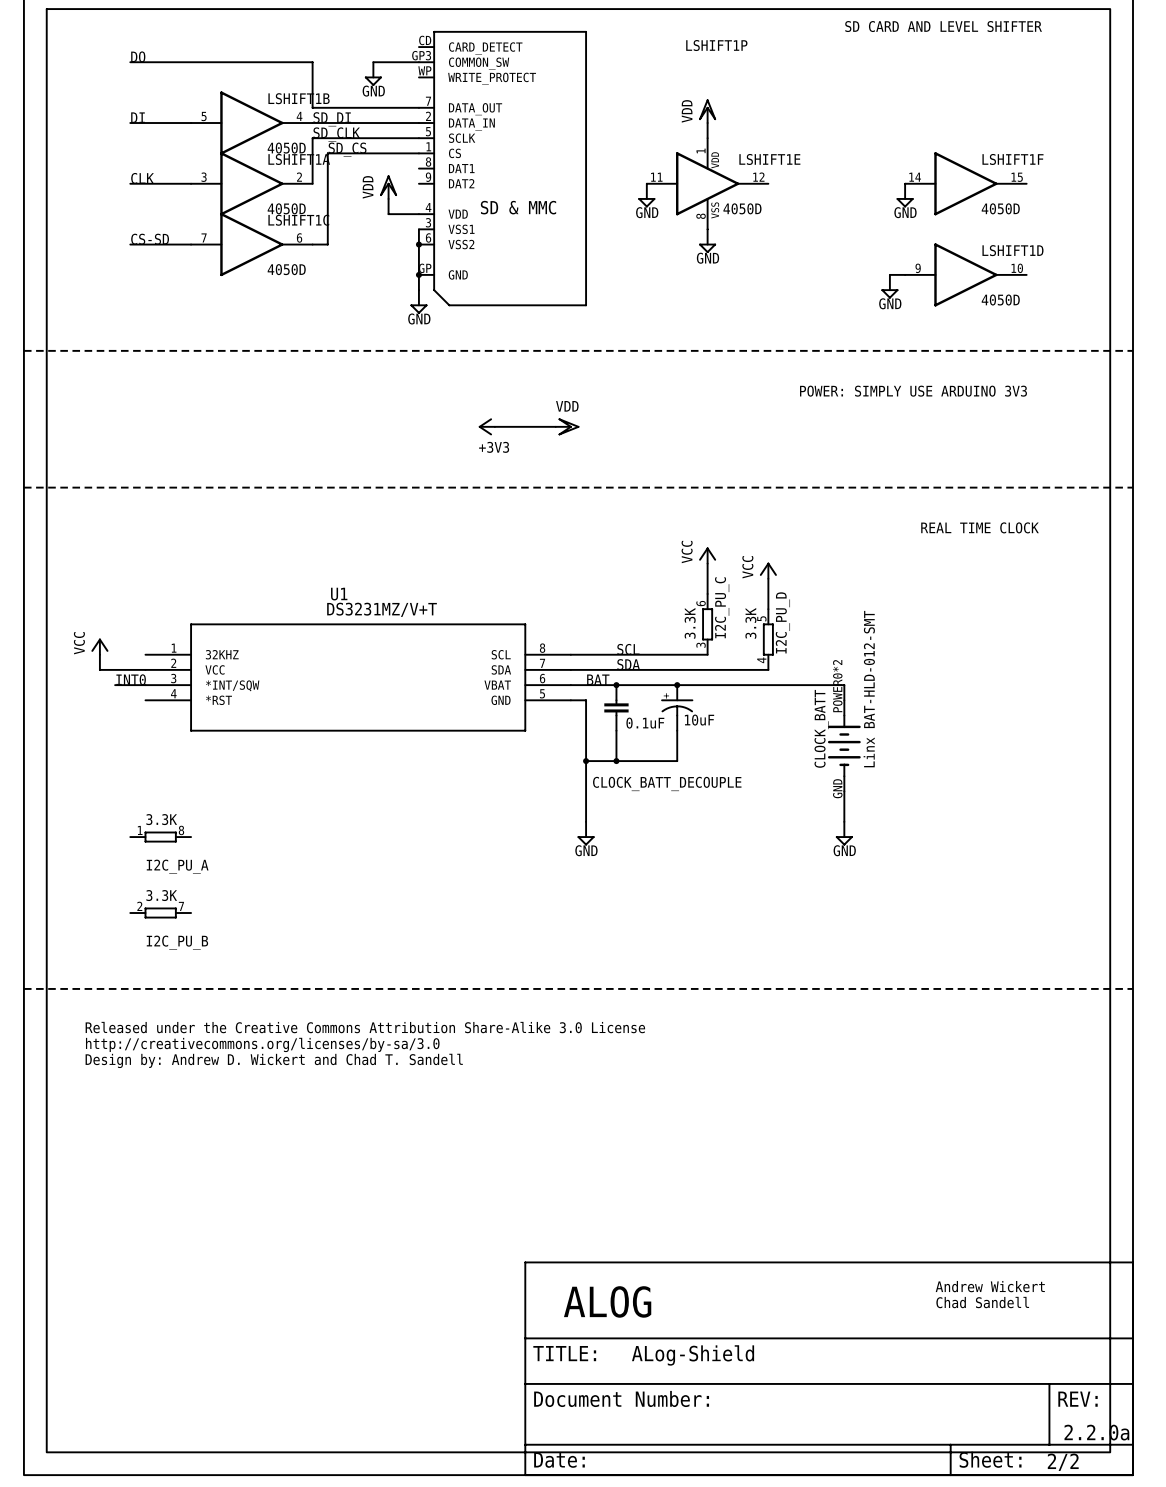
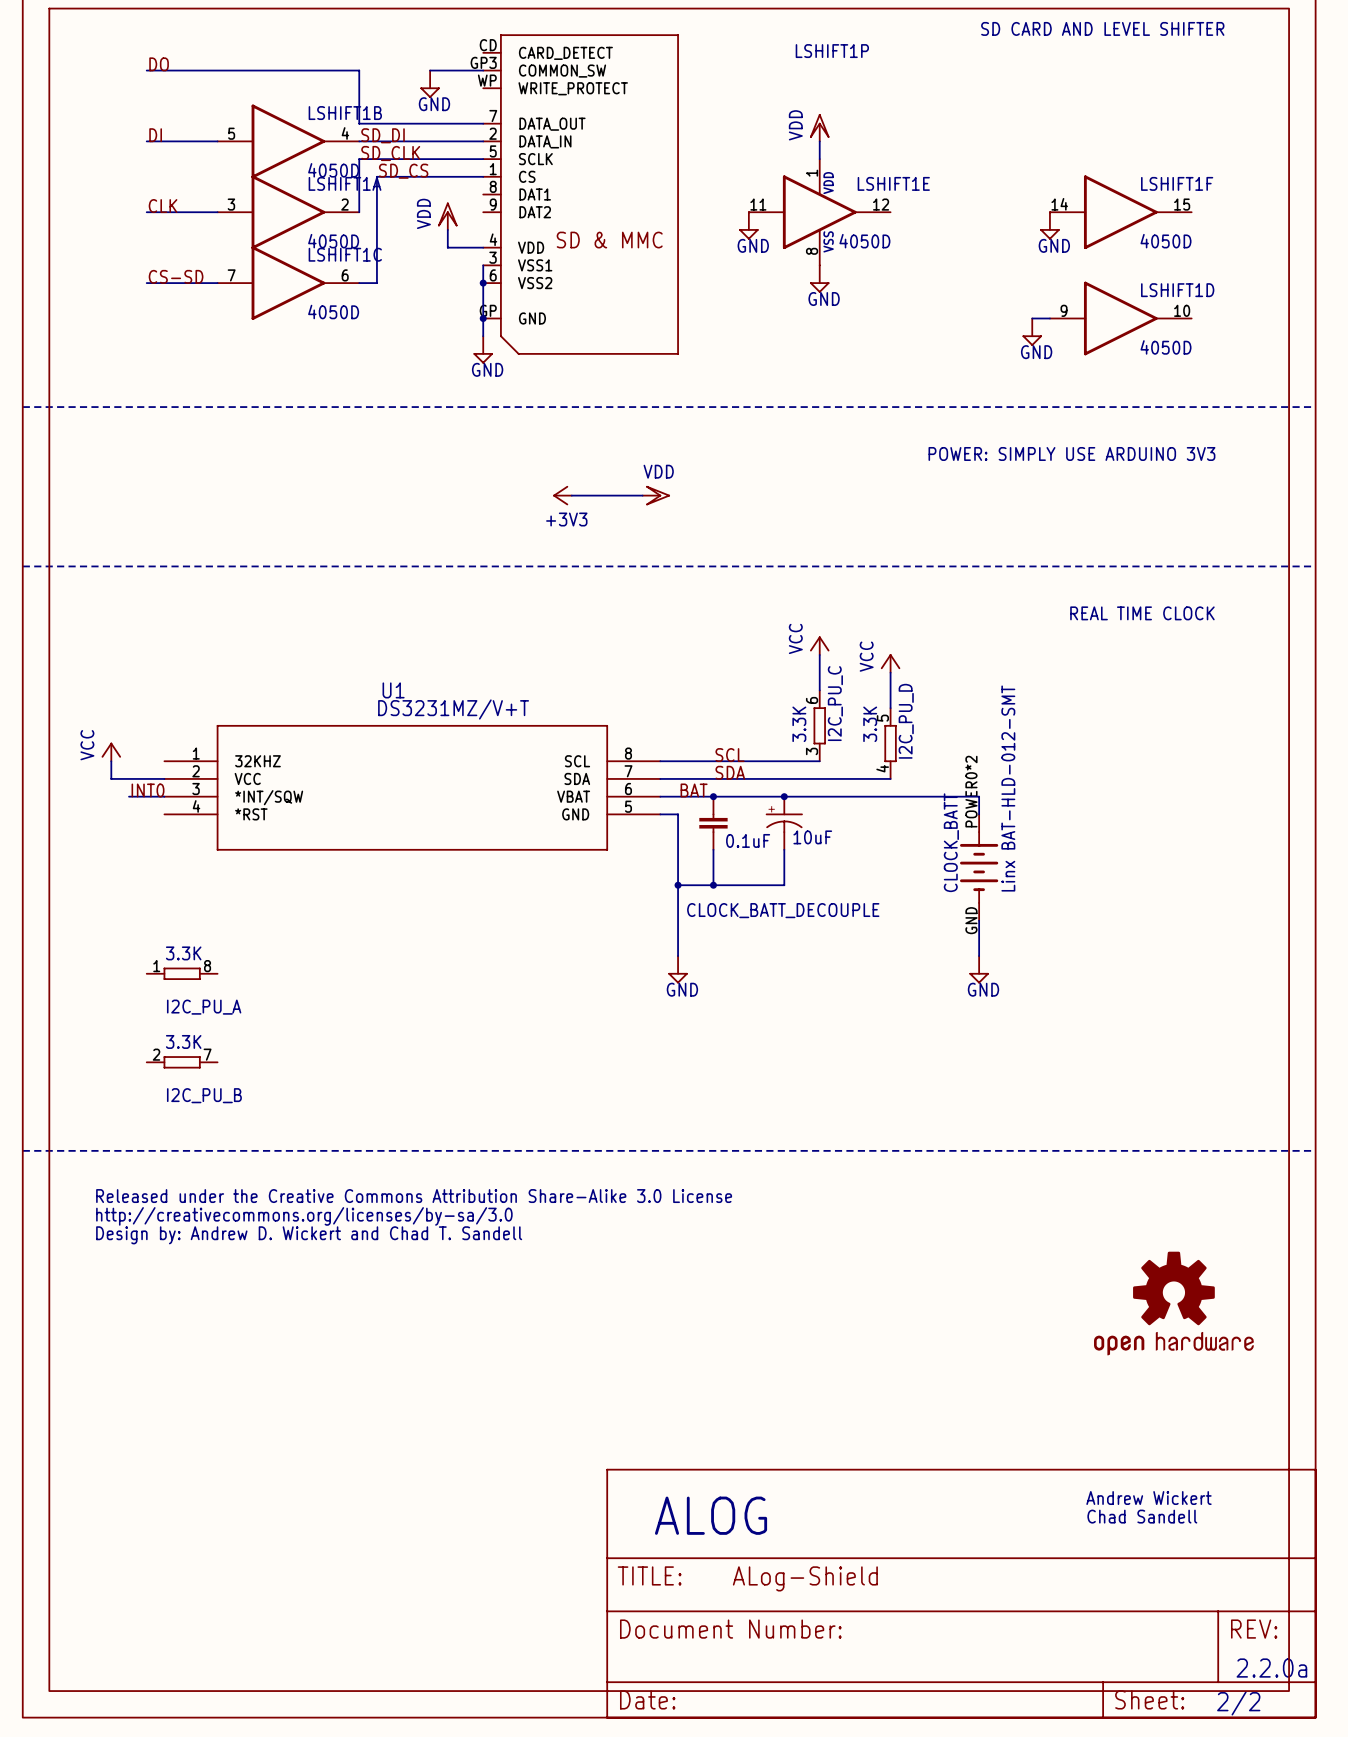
part: none -> (1173, 1303)

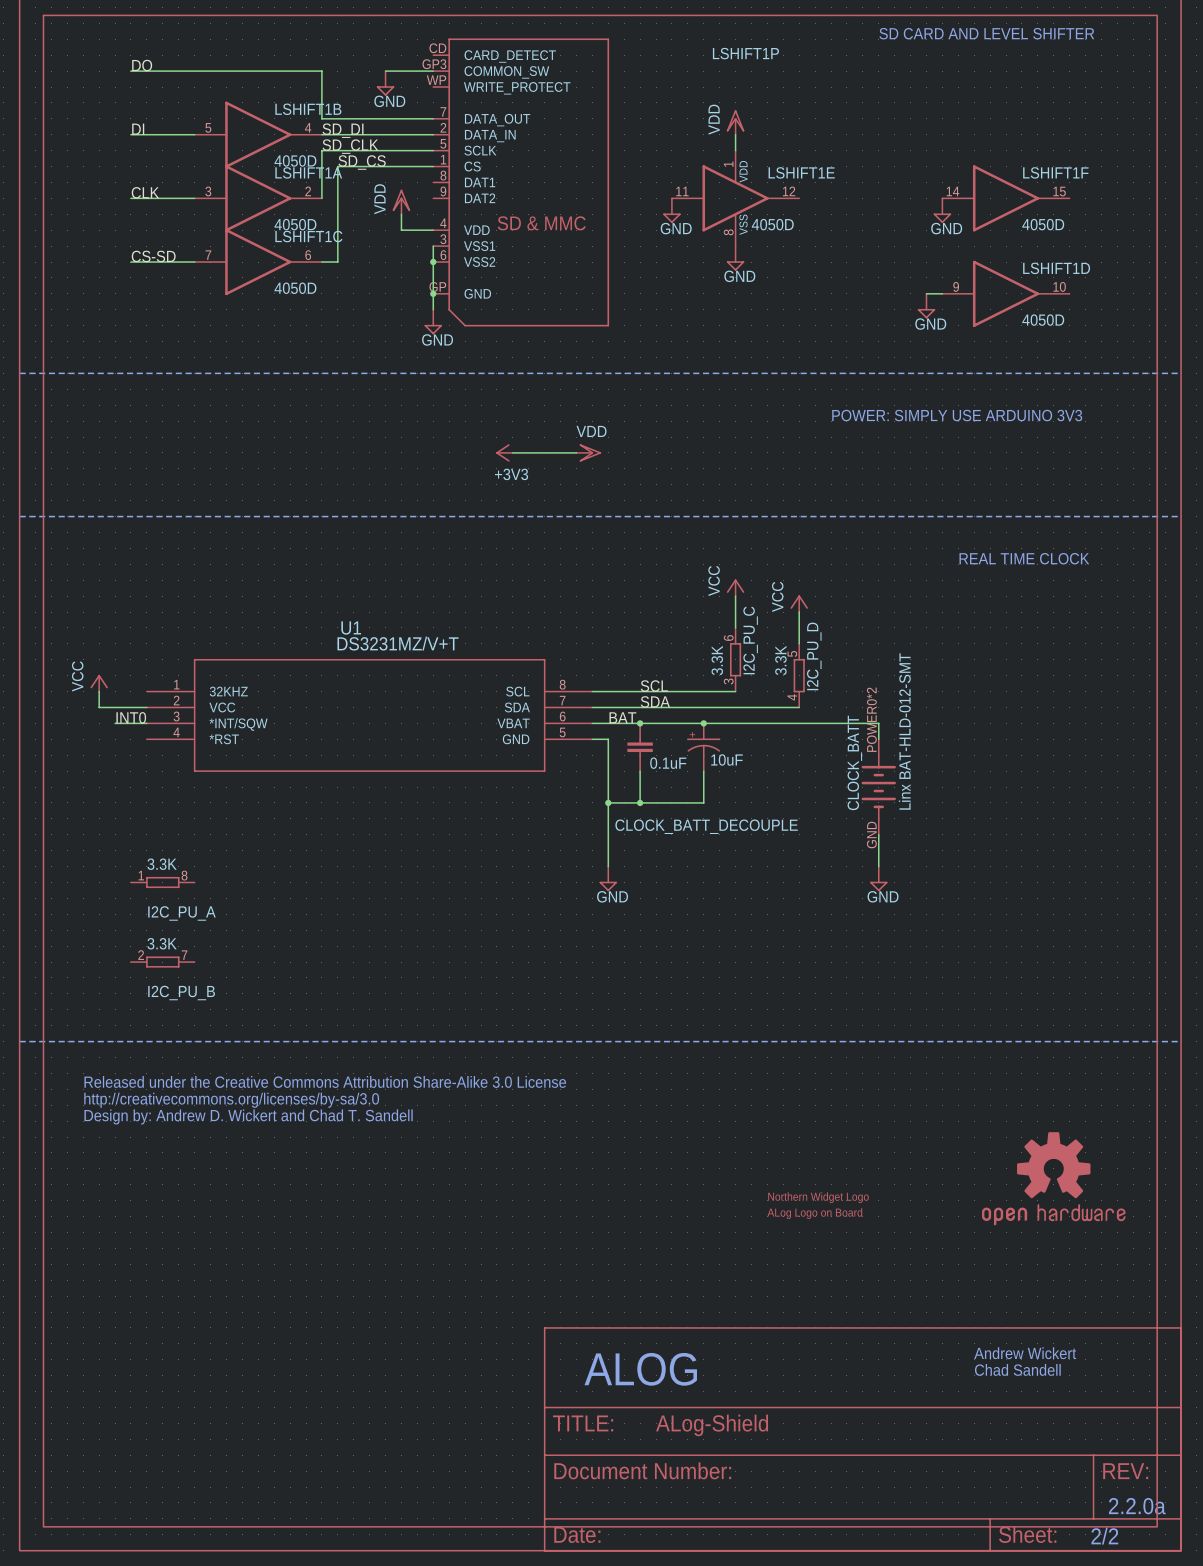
part: none -> (818, 1197)
part: none -> (814, 1213)

